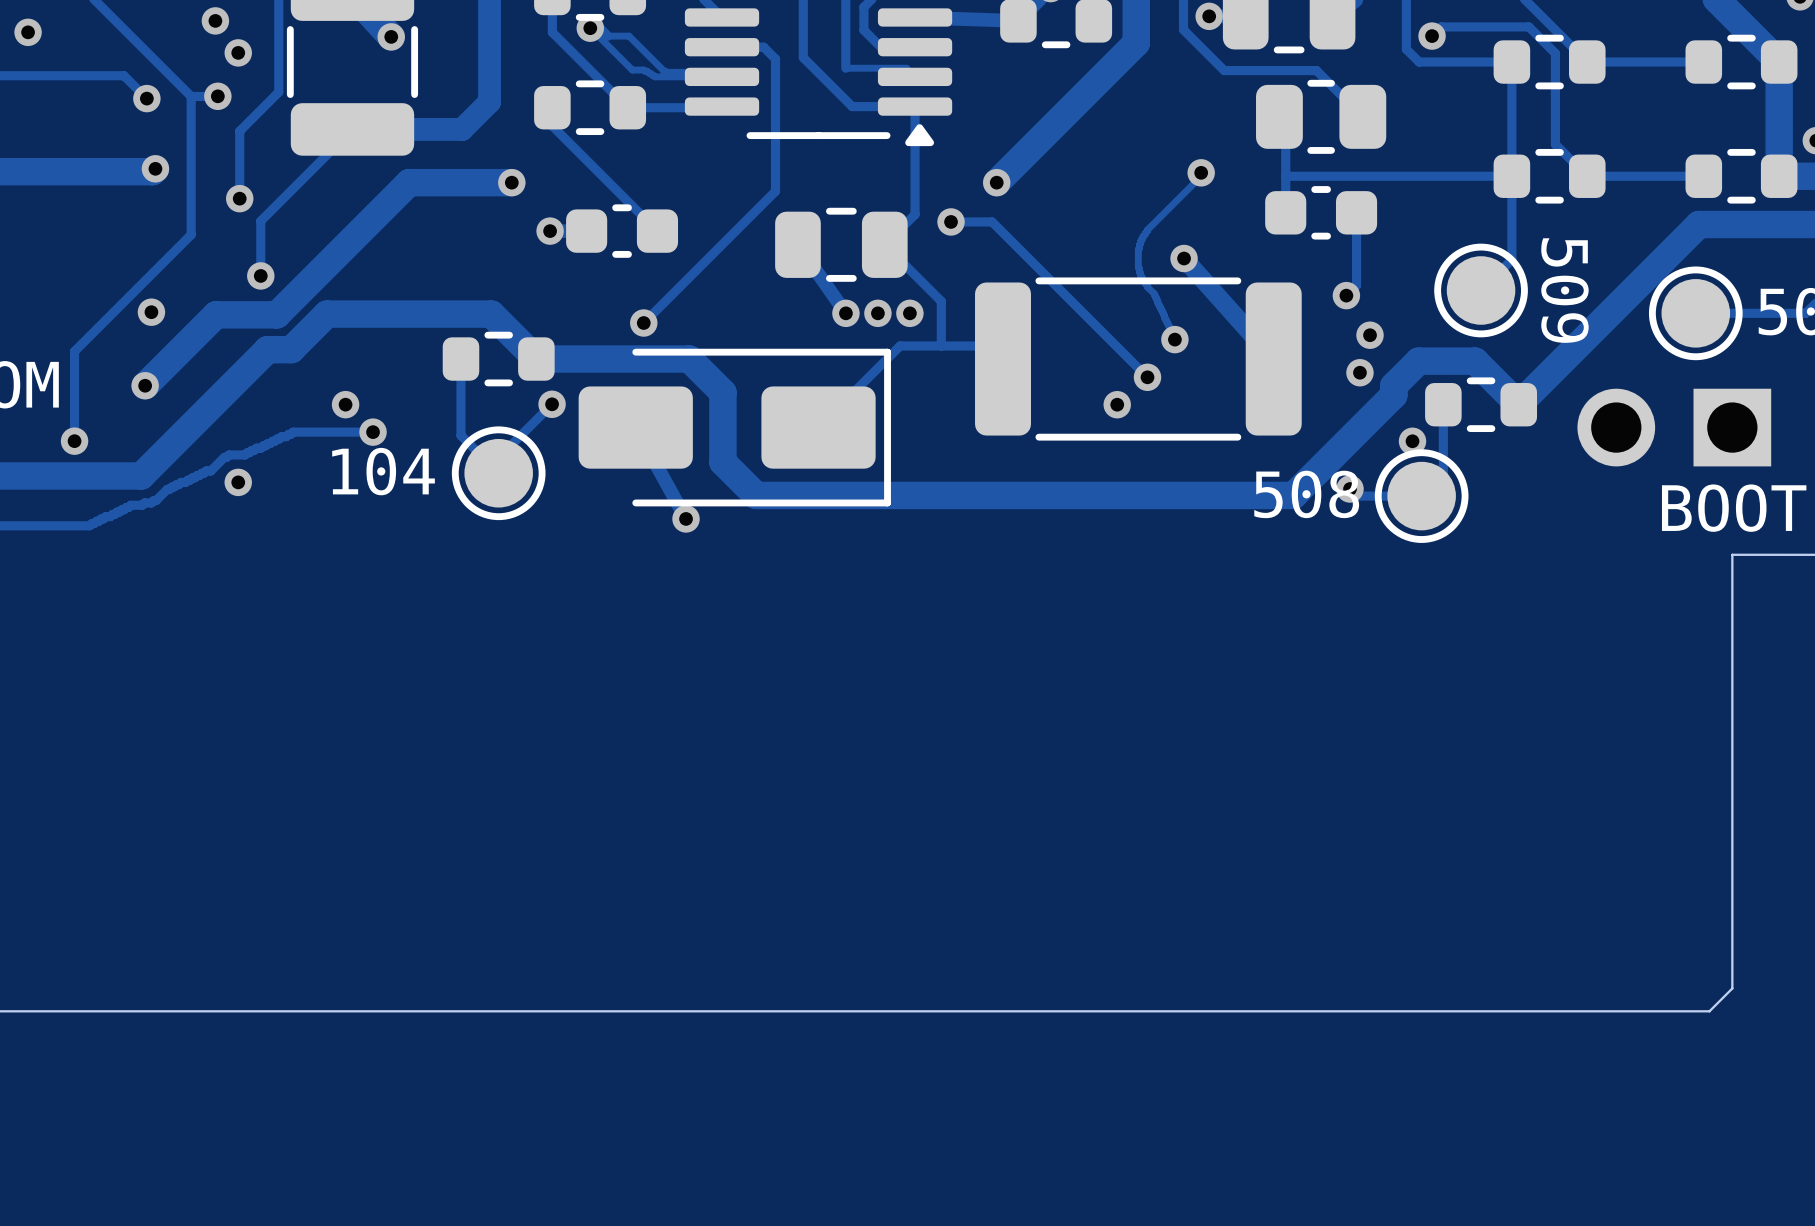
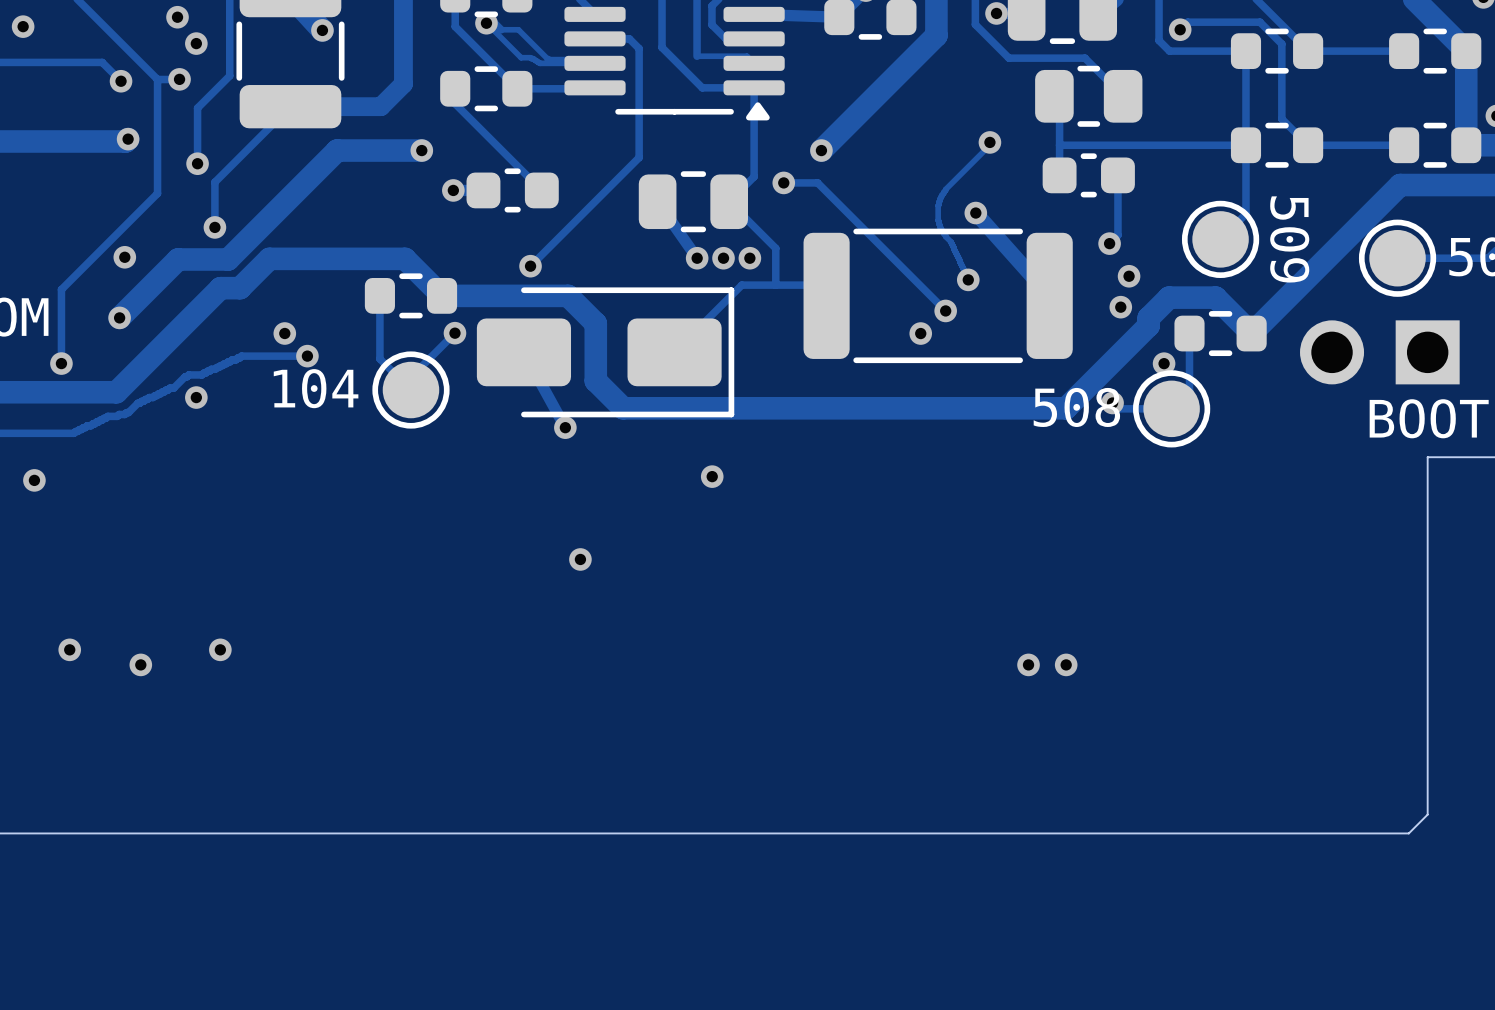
via: none -> (712, 476)
via: none -> (34, 480)
via: none -> (580, 559)
via: none -> (69, 649)
via: none -> (220, 649)
via: none -> (140, 664)
via: none -> (1028, 664)
via: none -> (1066, 664)

